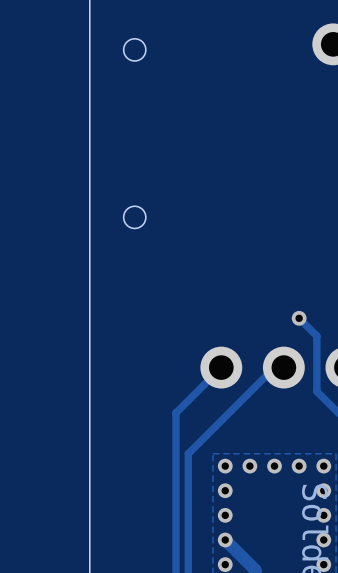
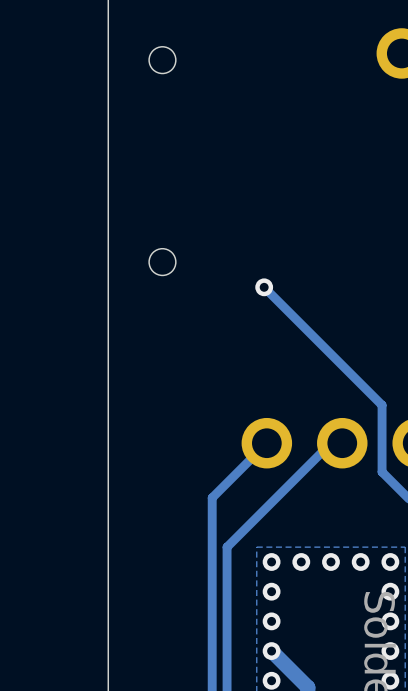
track: none -> (264, 287) (360, 383)
via position: (299, 318) -> (264, 287)

